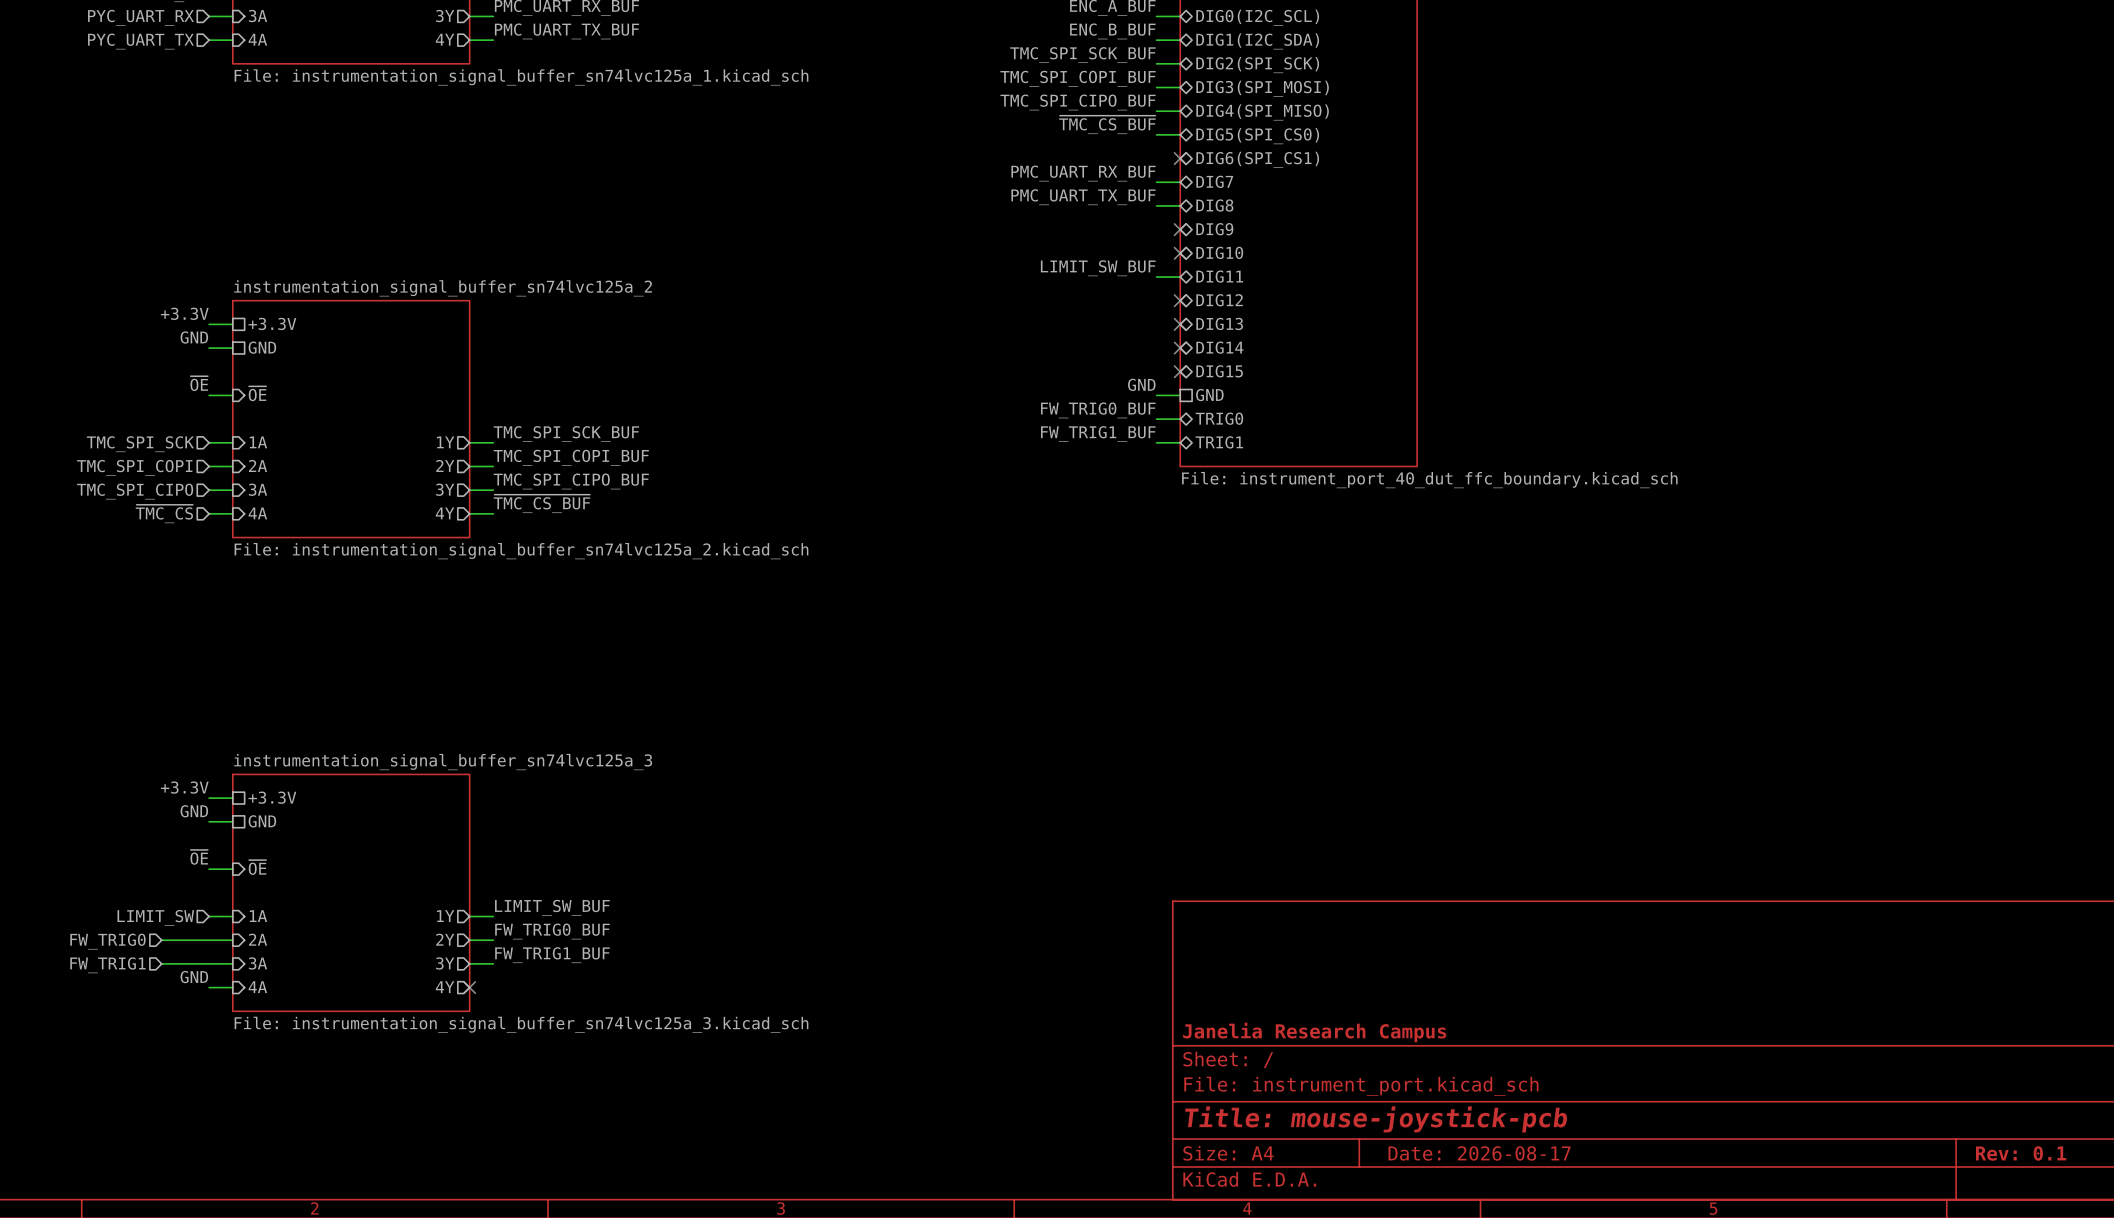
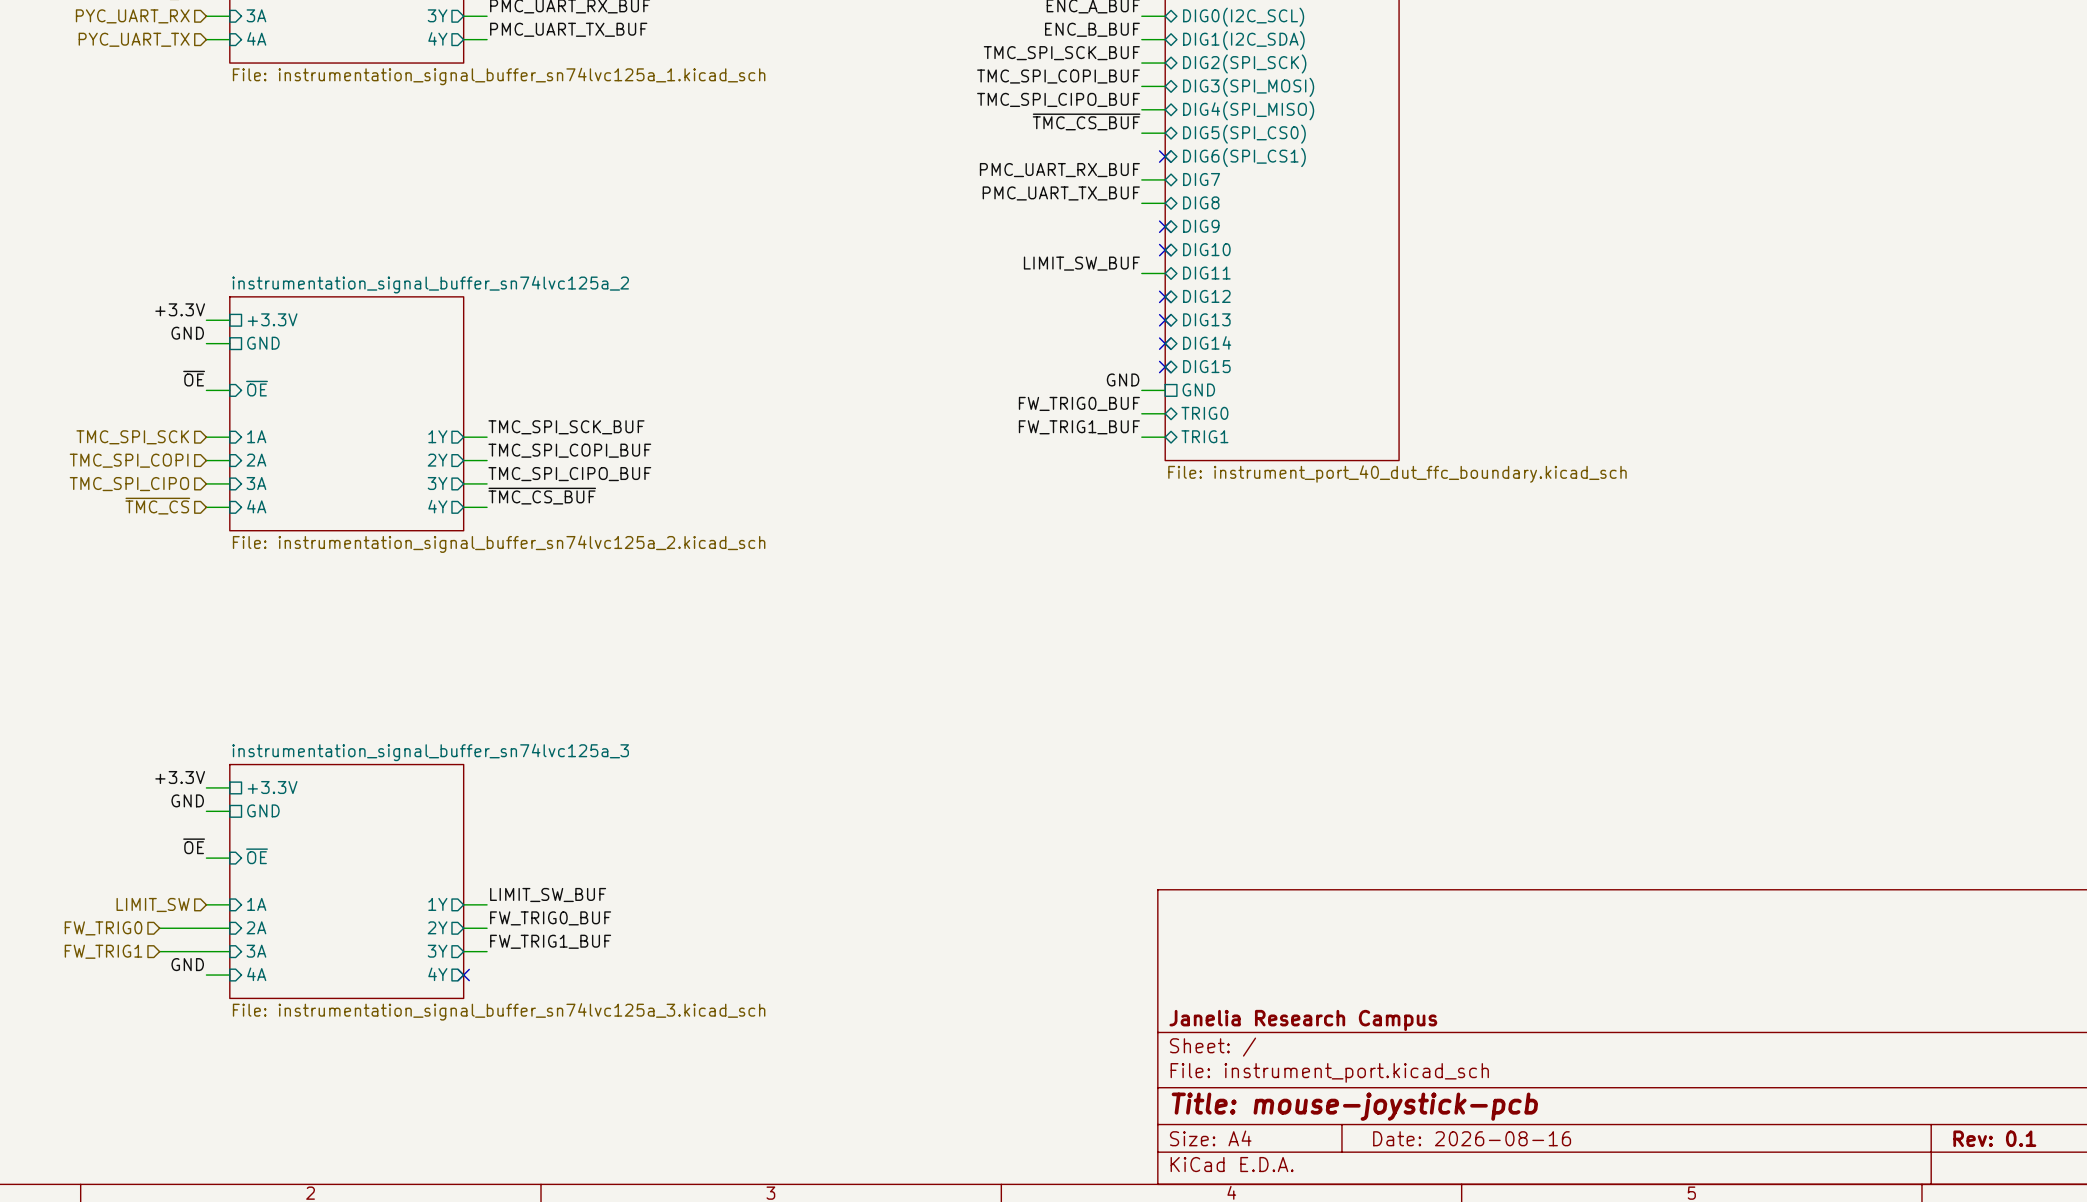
title block: Date: 2026-08-17 (1479, 1153) -> Date: 2026-08-16 (1472, 1138)

